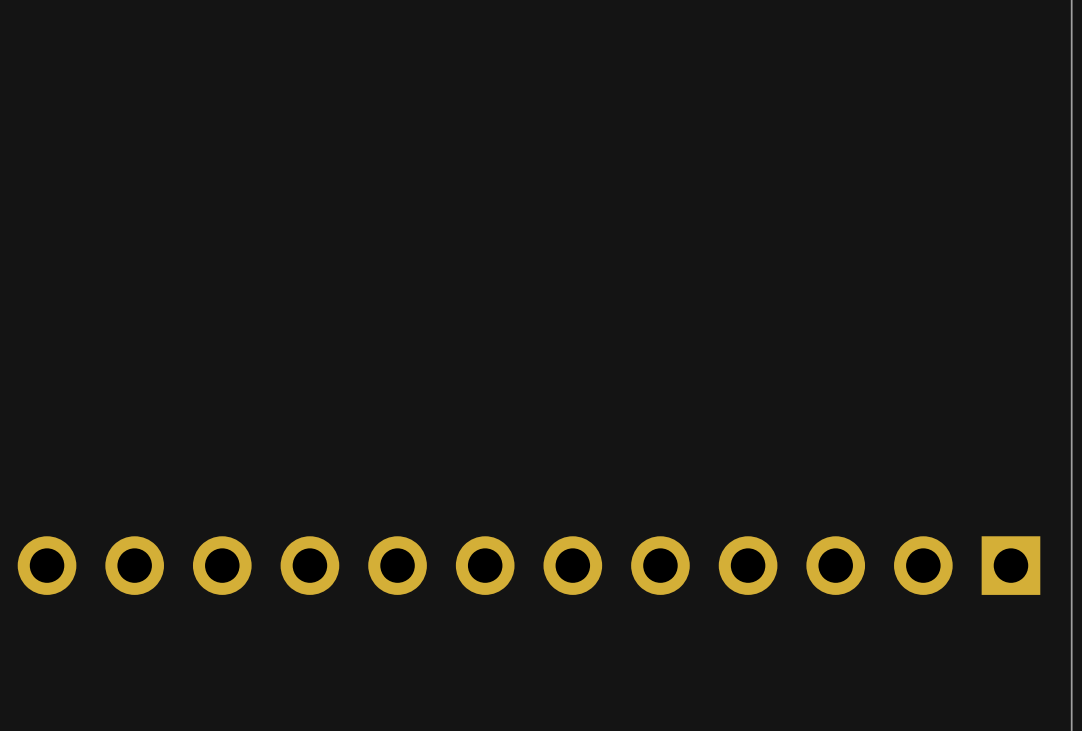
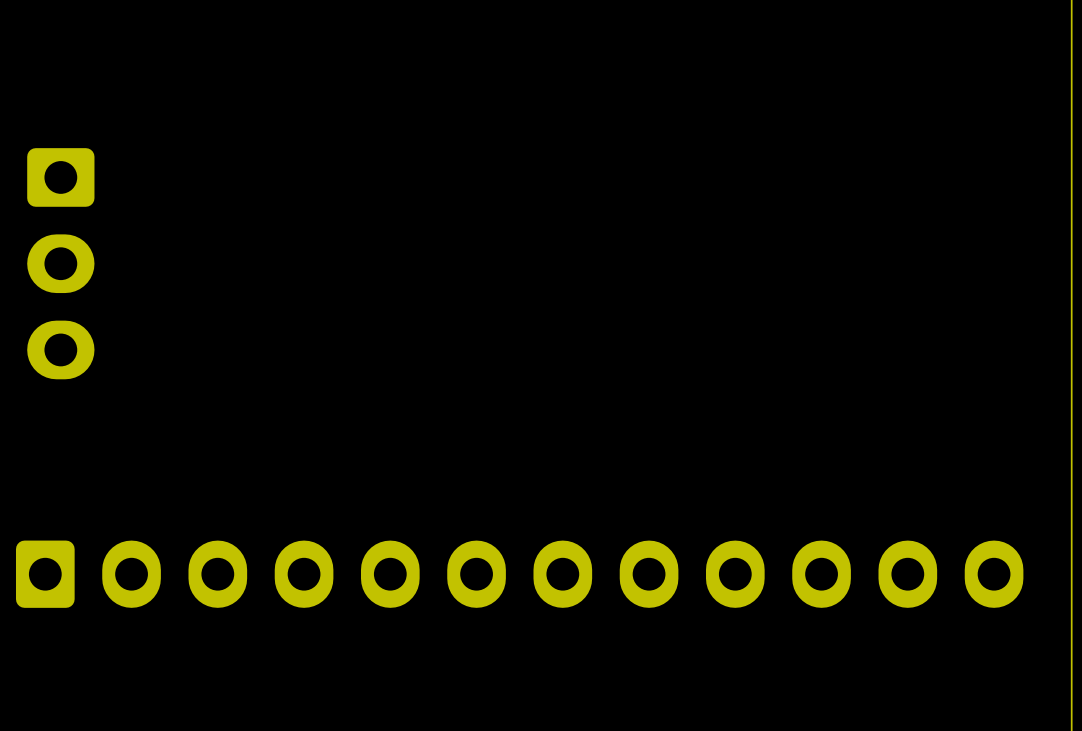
part: none -> (60, 263)
part footprint: [17, 536, 1041, 595] -> [15, 540, 1024, 608]

